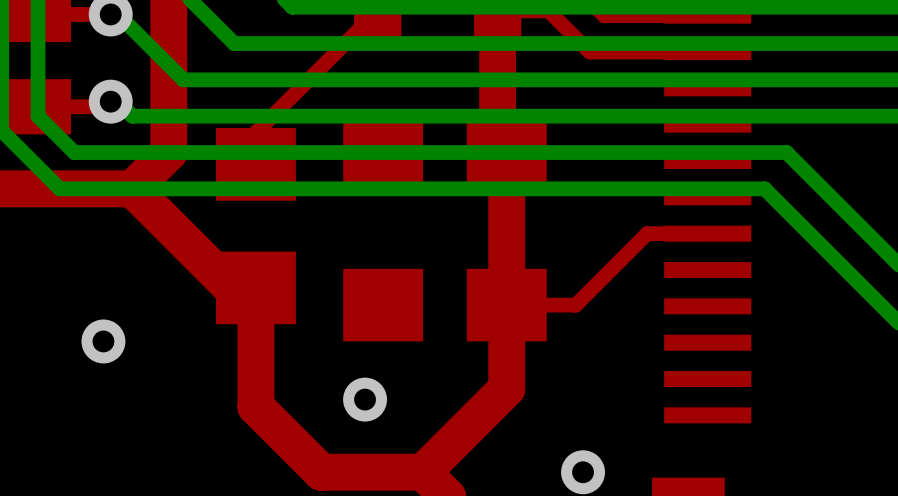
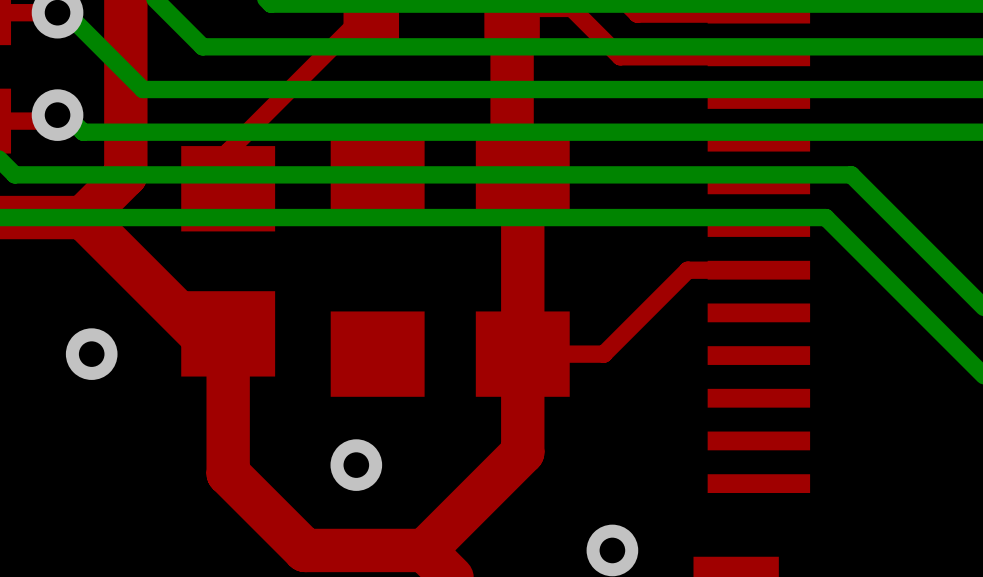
via position: (103, 341) -> (91, 354)

